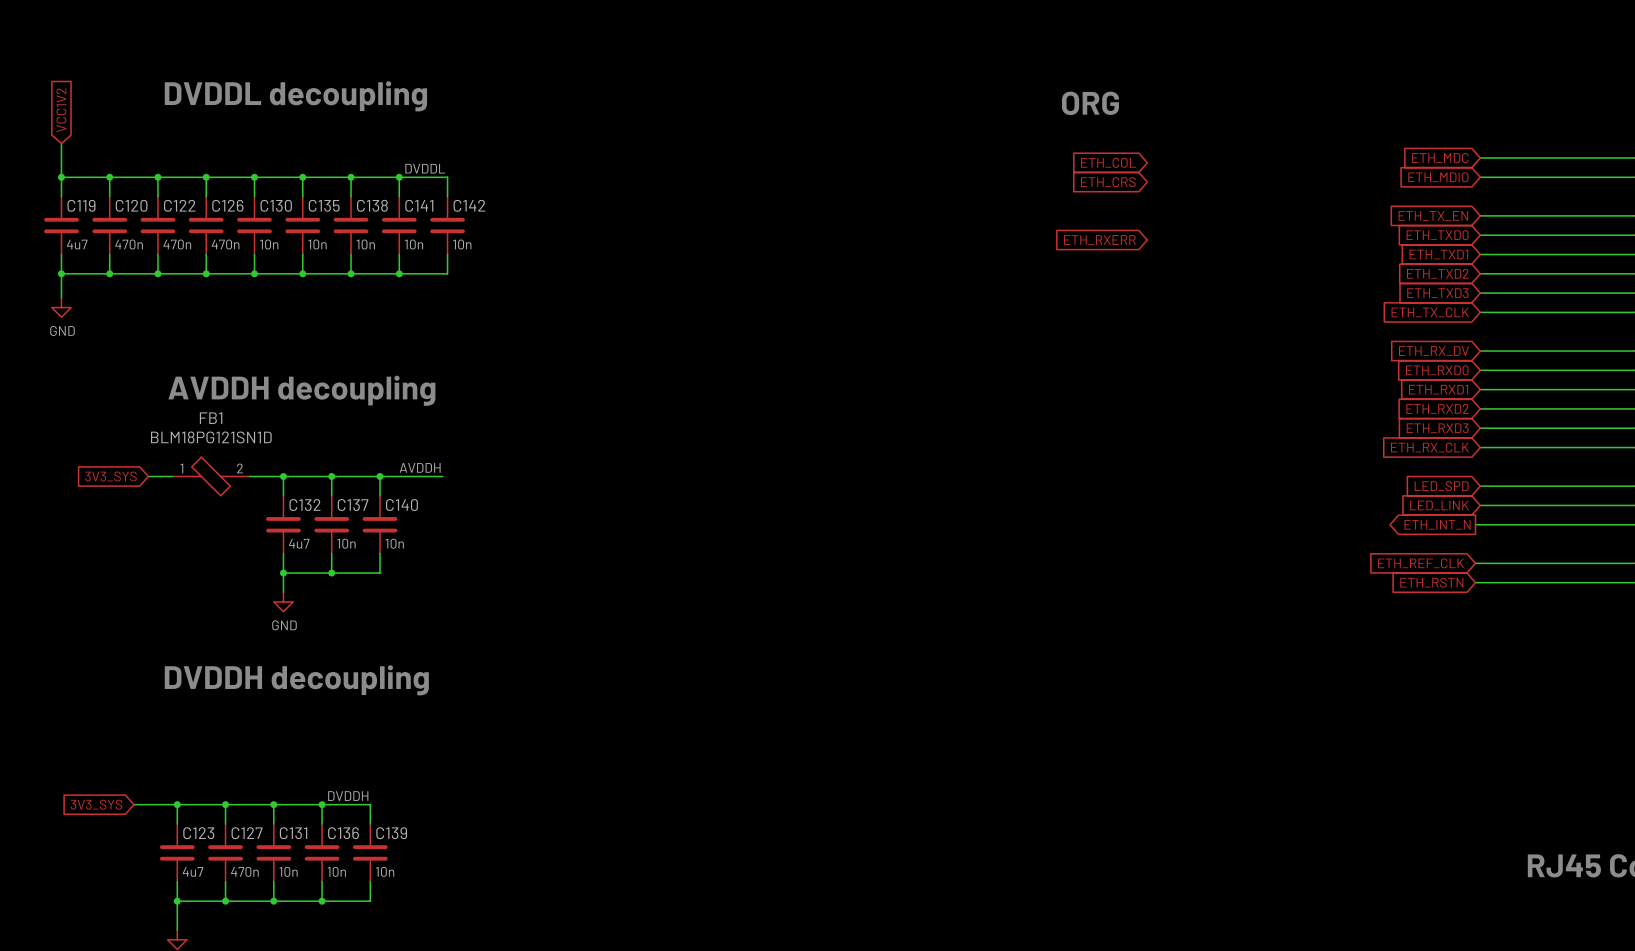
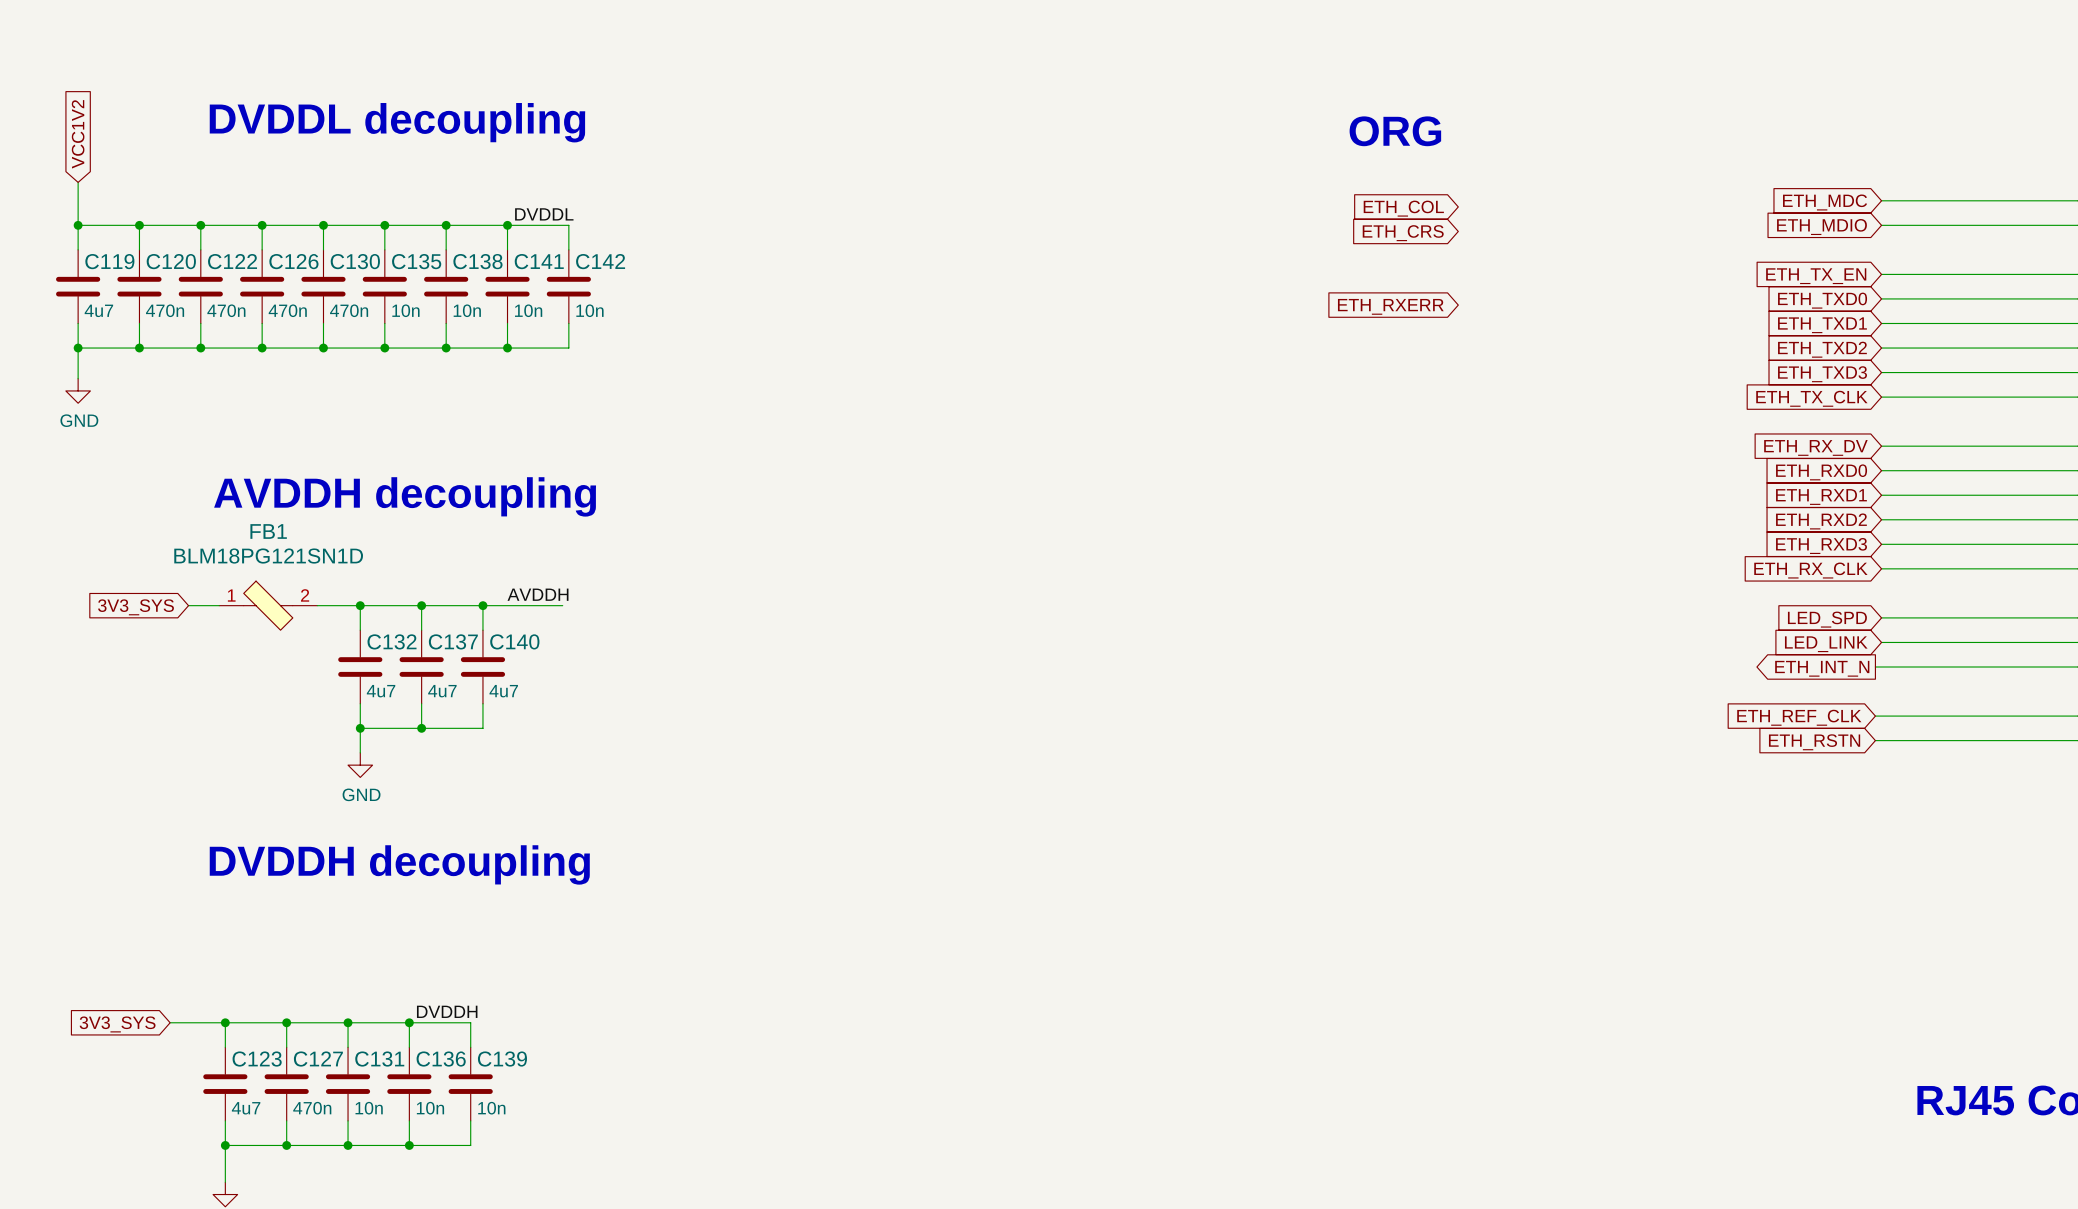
C130 text: 10n (269, 244) -> 470n (349, 310)
C137 text: 10n (346, 543) -> 4u7 (442, 691)
C140 text: 10n (394, 543) -> 4u7 (503, 691)

